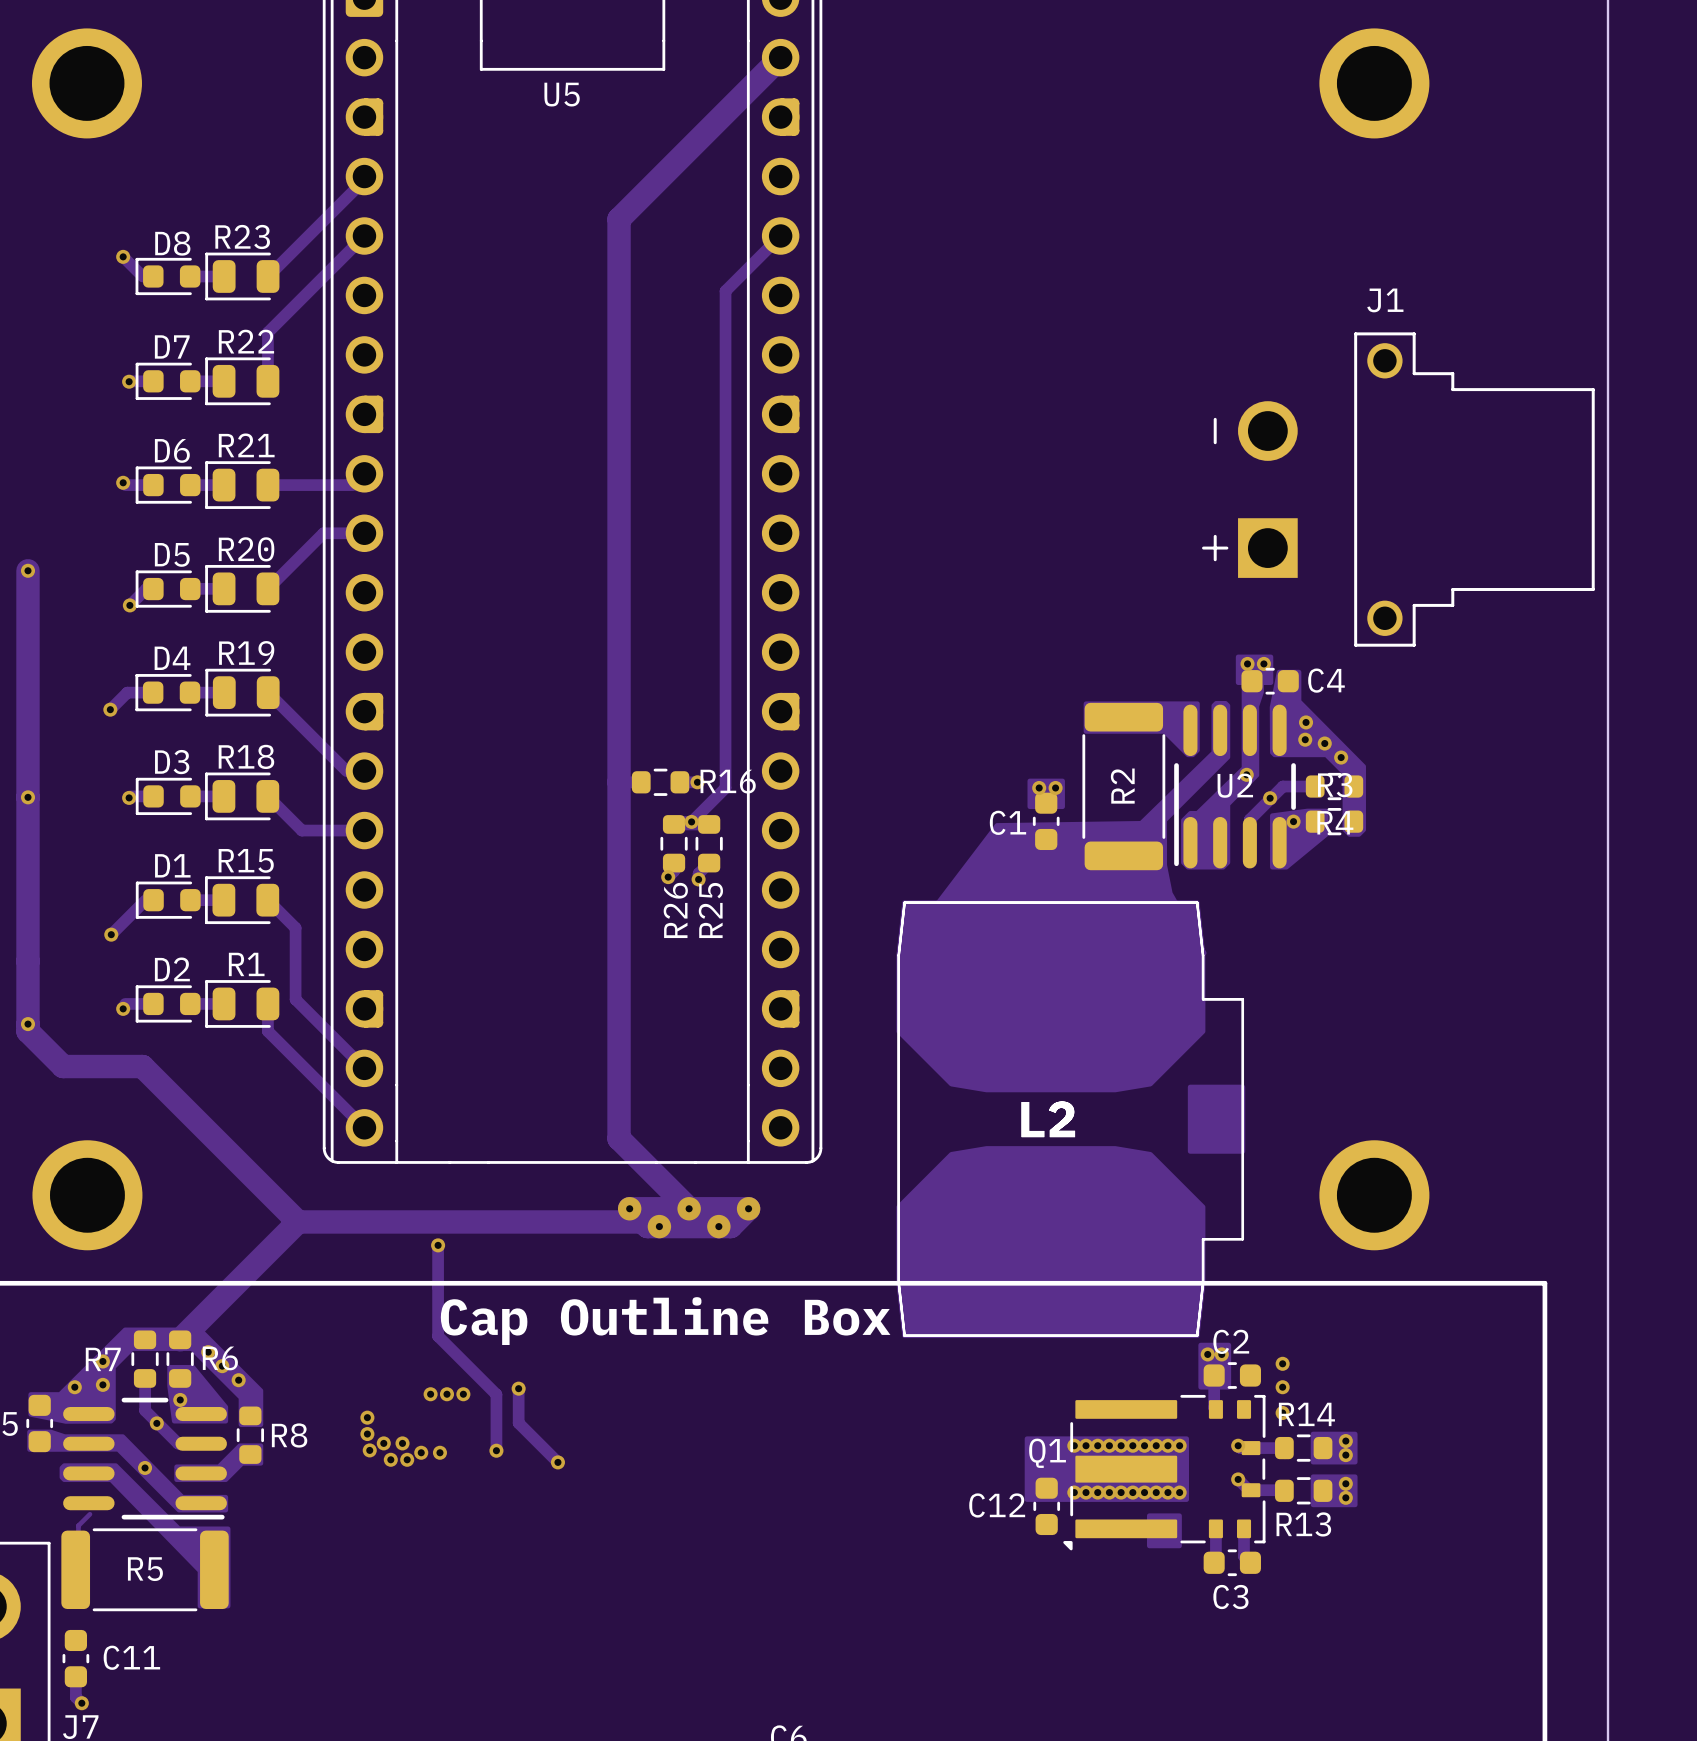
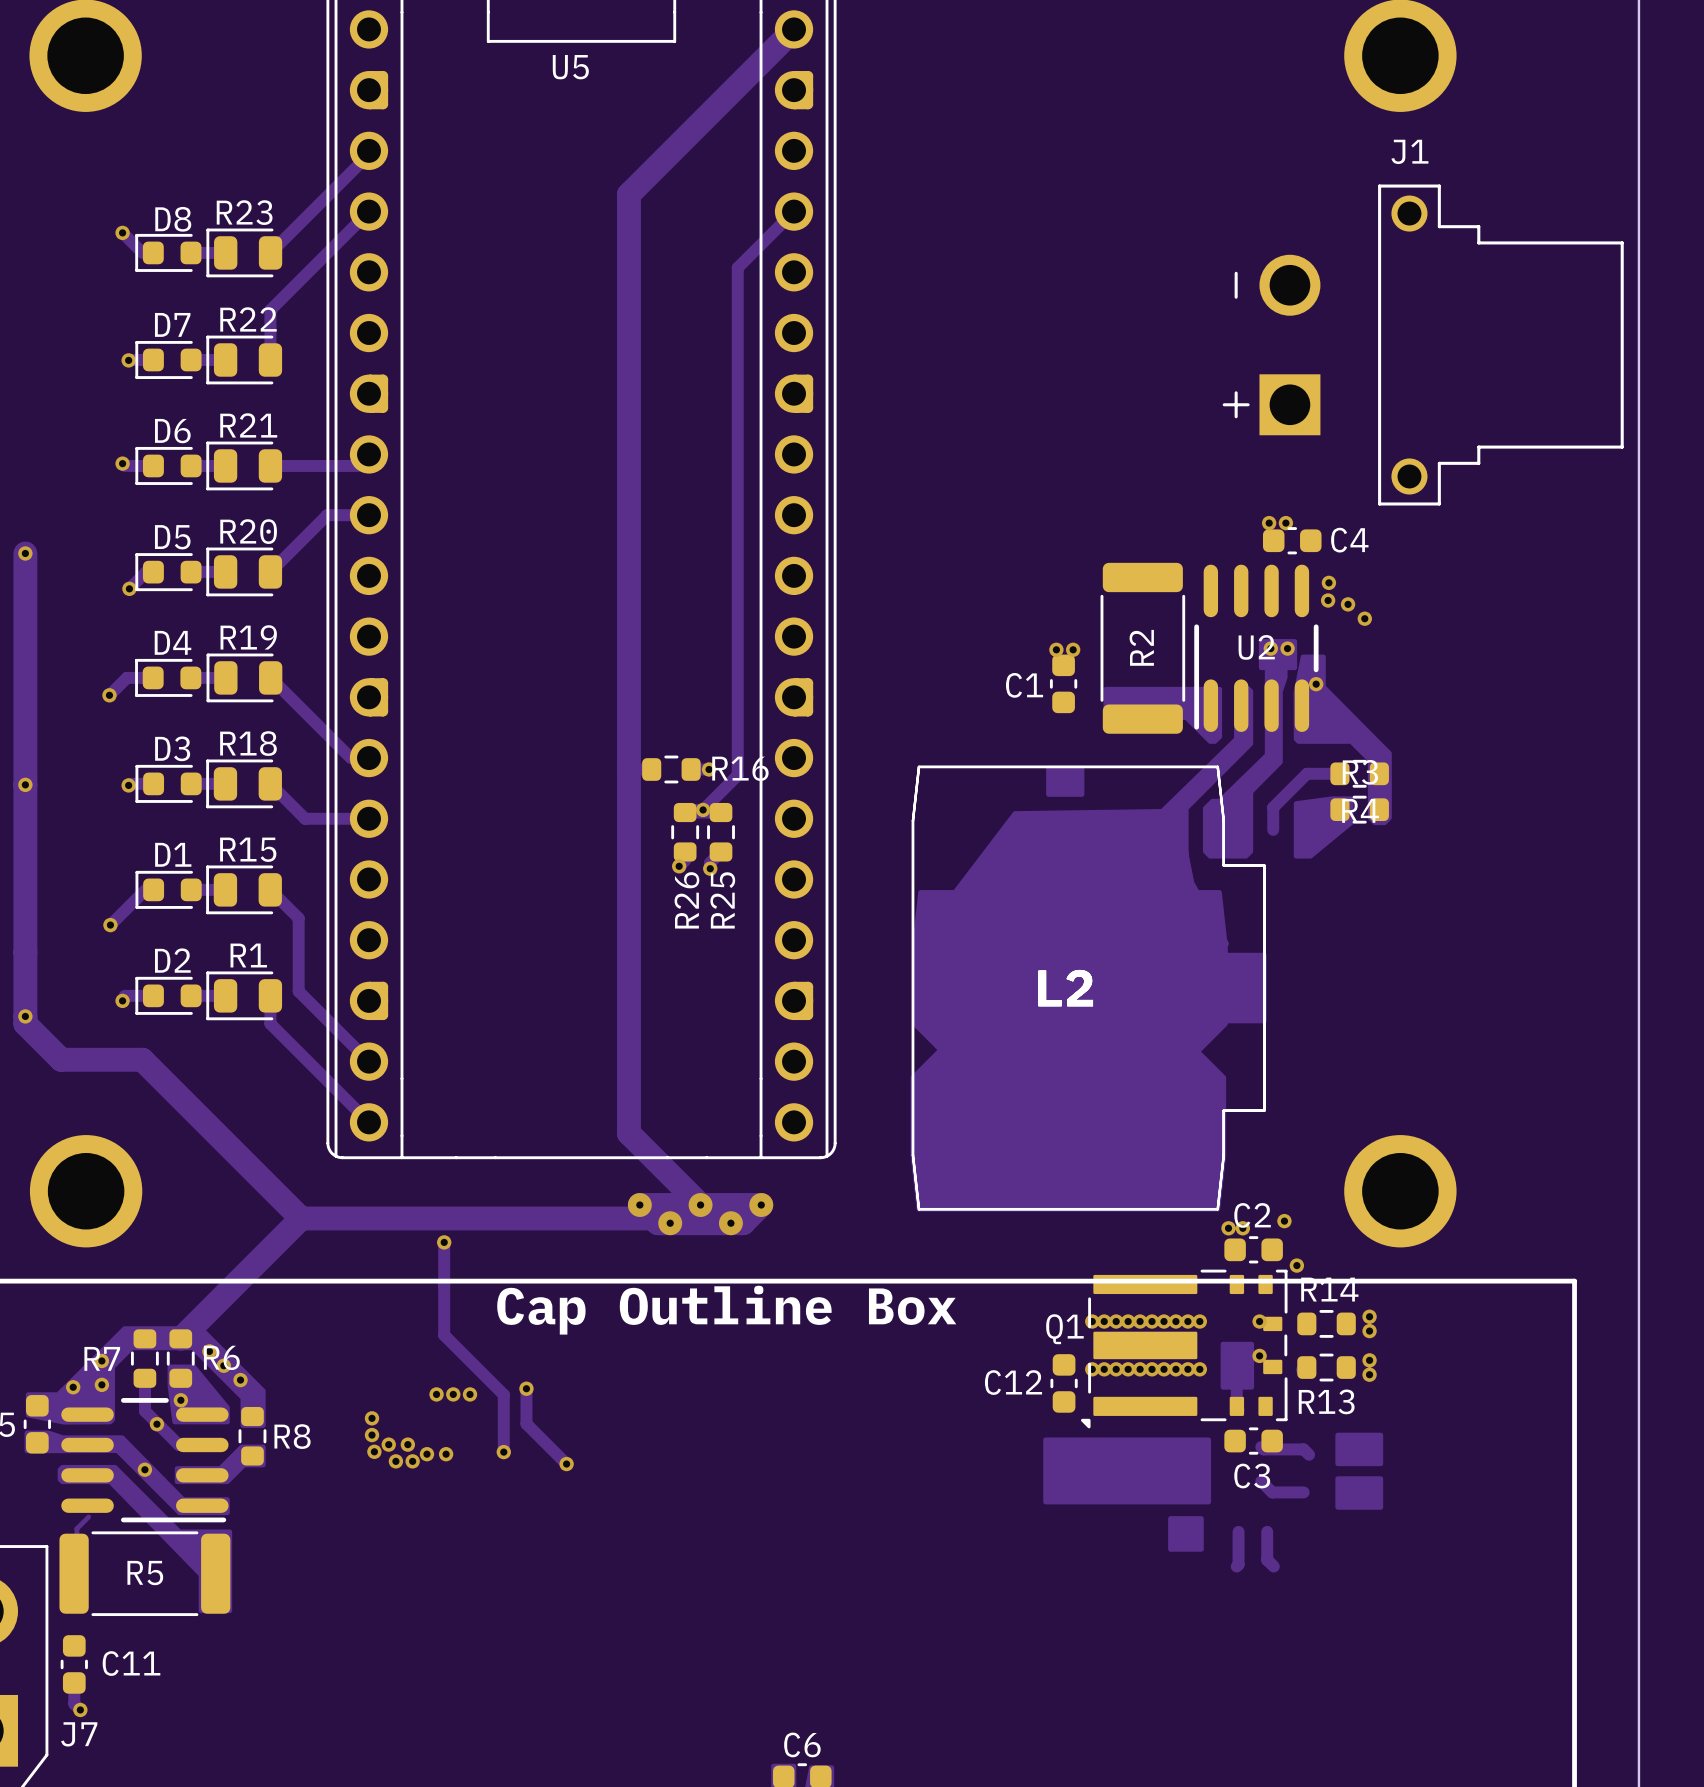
J1 position: (1398, 489) -> (1423, 345)
via: none -> (1269, 523)
via: none -> (1285, 523)
via: none -> (1328, 582)
via: none -> (1328, 600)
via: none -> (1348, 604)
via: none -> (1364, 618)
via: none -> (1056, 649)
via: none -> (1073, 649)
C4 position: (1270, 681) -> (1292, 540)
via: none -> (1316, 684)
via: (1306, 722) -> none
via: (1305, 739) -> none
via: (1324, 743) -> none
via: (1341, 757) -> none
via: (1246, 774) -> none
R2 position: (1123, 786) -> (1142, 648)
U2 position: (1235, 786) -> (1256, 648)
via: (1039, 787) -> none
via: (1055, 787) -> none
via: (1270, 798) -> none
C1 position: (1046, 821) -> (1063, 683)
via: (1293, 821) -> none
line: (904, 902) (898, 955) (898, 1283) (904, 1335) (1197, 1335) (1203, 1283) (1203, 1239) (1242, 1239) (1242, 999) (1203, 999) (1203, 955) (1197, 902) (904, 902) -> (918, 766) (912, 820) (912, 1155) (918, 1209) (1217, 1209) (1223, 1155) (1223, 1110) (1264, 1110) (1264, 865) (1223, 865) (1223, 820) (1217, 766) (918, 766)
text position: L2 (1048, 1119) -> L2 (1065, 988)
drawing position: (1216, 1119) -> (1237, 988)
via: none -> (1284, 1221)
via: none -> (1228, 1228)
via: none -> (1242, 1228)
drawing position: (1050, 1242) -> (1068, 1113)
via: none -> (1296, 1265)
via: none -> (1369, 1316)
text position: Cap Outline Box (665, 1321) -> Cap Outline Box (726, 1310)
via: none -> (1092, 1321)
via: none -> (1104, 1321)
via: none -> (1116, 1321)
via: none -> (1128, 1321)
via: none -> (1140, 1321)
via: none -> (1152, 1321)
via: none -> (1163, 1321)
via: none -> (1175, 1321)
via: none -> (1187, 1321)
via: none -> (1199, 1321)
via: none -> (1259, 1321)
via: none -> (1369, 1331)
via: (1207, 1354) -> none
via: (1221, 1354) -> none
via: none -> (1259, 1355)
via: none -> (1369, 1360)
via: (1282, 1363) -> none
via: none -> (1092, 1369)
via: none -> (1104, 1369)
via: none -> (1116, 1369)
via: none -> (1128, 1369)
via: none -> (1140, 1369)
via: none -> (1152, 1369)
via: none -> (1163, 1369)
via: none -> (1175, 1369)
via: none -> (1187, 1369)
via: none -> (1199, 1369)
via: none -> (1369, 1374)
C2 position: (1232, 1375) -> (1253, 1249)
via: (1282, 1387) -> none
via: (1282, 1412) -> none
via: (1345, 1441) -> none
via: (1074, 1445) -> none
via: (1086, 1445) -> none
via: (1097, 1445) -> none
via: (1109, 1445) -> none
via: (1121, 1445) -> none
via: (1132, 1445) -> none
via: (1144, 1445) -> none
via: (1156, 1445) -> none
via: (1167, 1445) -> none
via: (1179, 1445) -> none
via: (1238, 1445) -> none
R13 position: (1303, 1448) -> (1326, 1323)
via: (1345, 1455) -> none
Q1 position: (1164, 1472) -> (1184, 1349)
via: (1238, 1479) -> none
via: (1345, 1483) -> none
R14 position: (1303, 1490) -> (1326, 1367)
via: (1074, 1492) -> none
via: (1086, 1492) -> none
via: (1097, 1492) -> none
via: (1109, 1492) -> none
via: (1121, 1492) -> none
via: (1132, 1492) -> none
via: (1144, 1492) -> none
via: (1156, 1492) -> none
via: (1167, 1492) -> none
via: (1179, 1492) -> none
via: (1345, 1497) -> none
C12 position: (1046, 1506) -> (1064, 1383)
C3 position: (1232, 1562) -> (1253, 1441)

